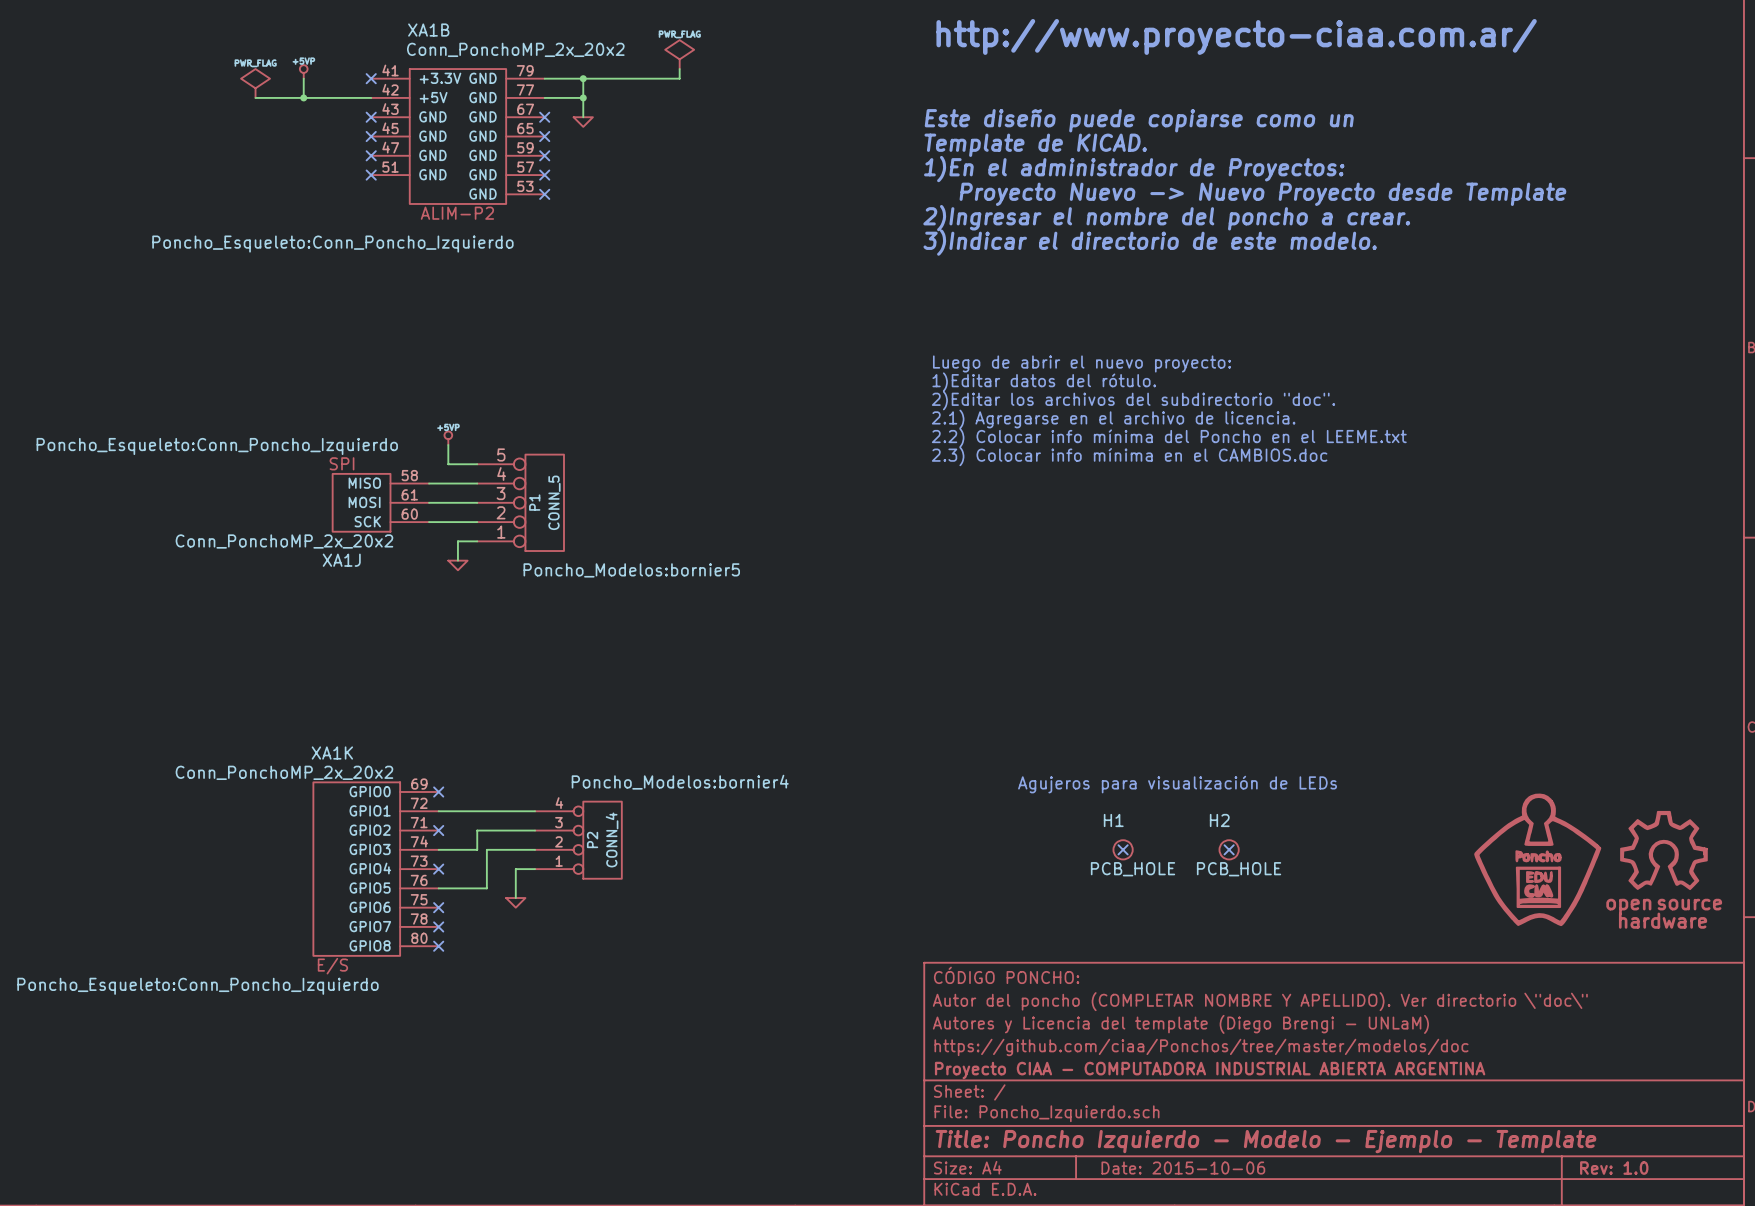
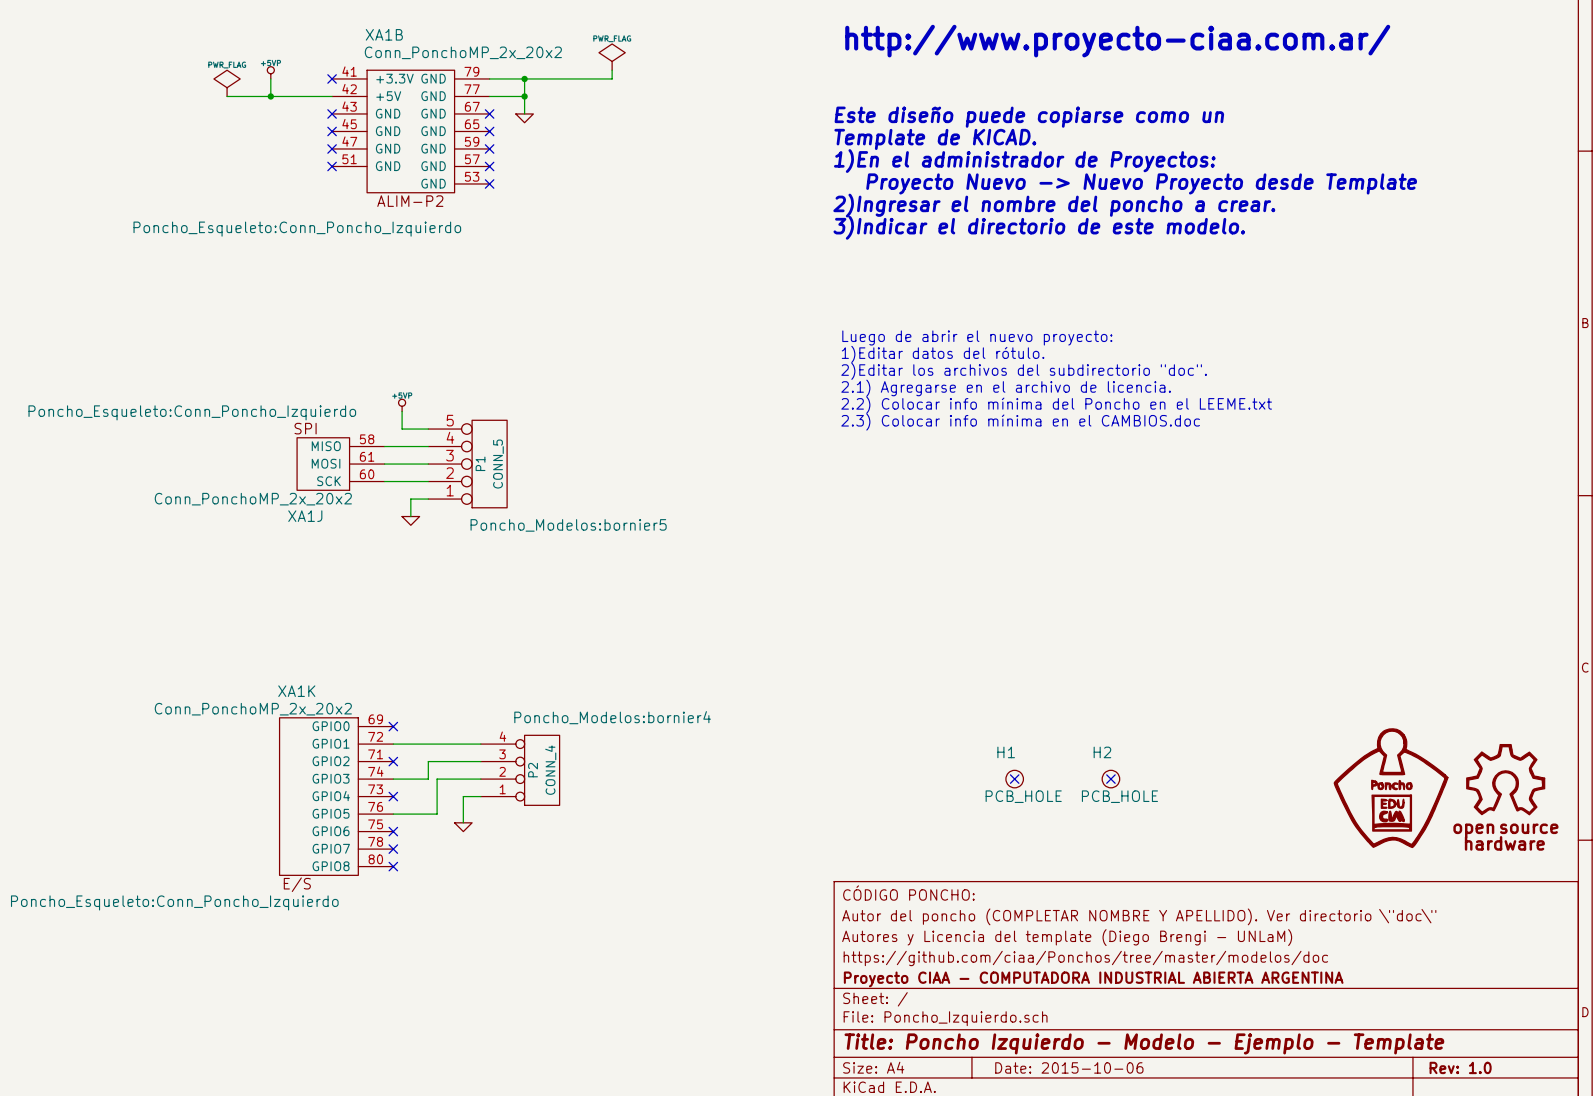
text: Agujeros para visualización de LEDs (1177, 784) -> none

